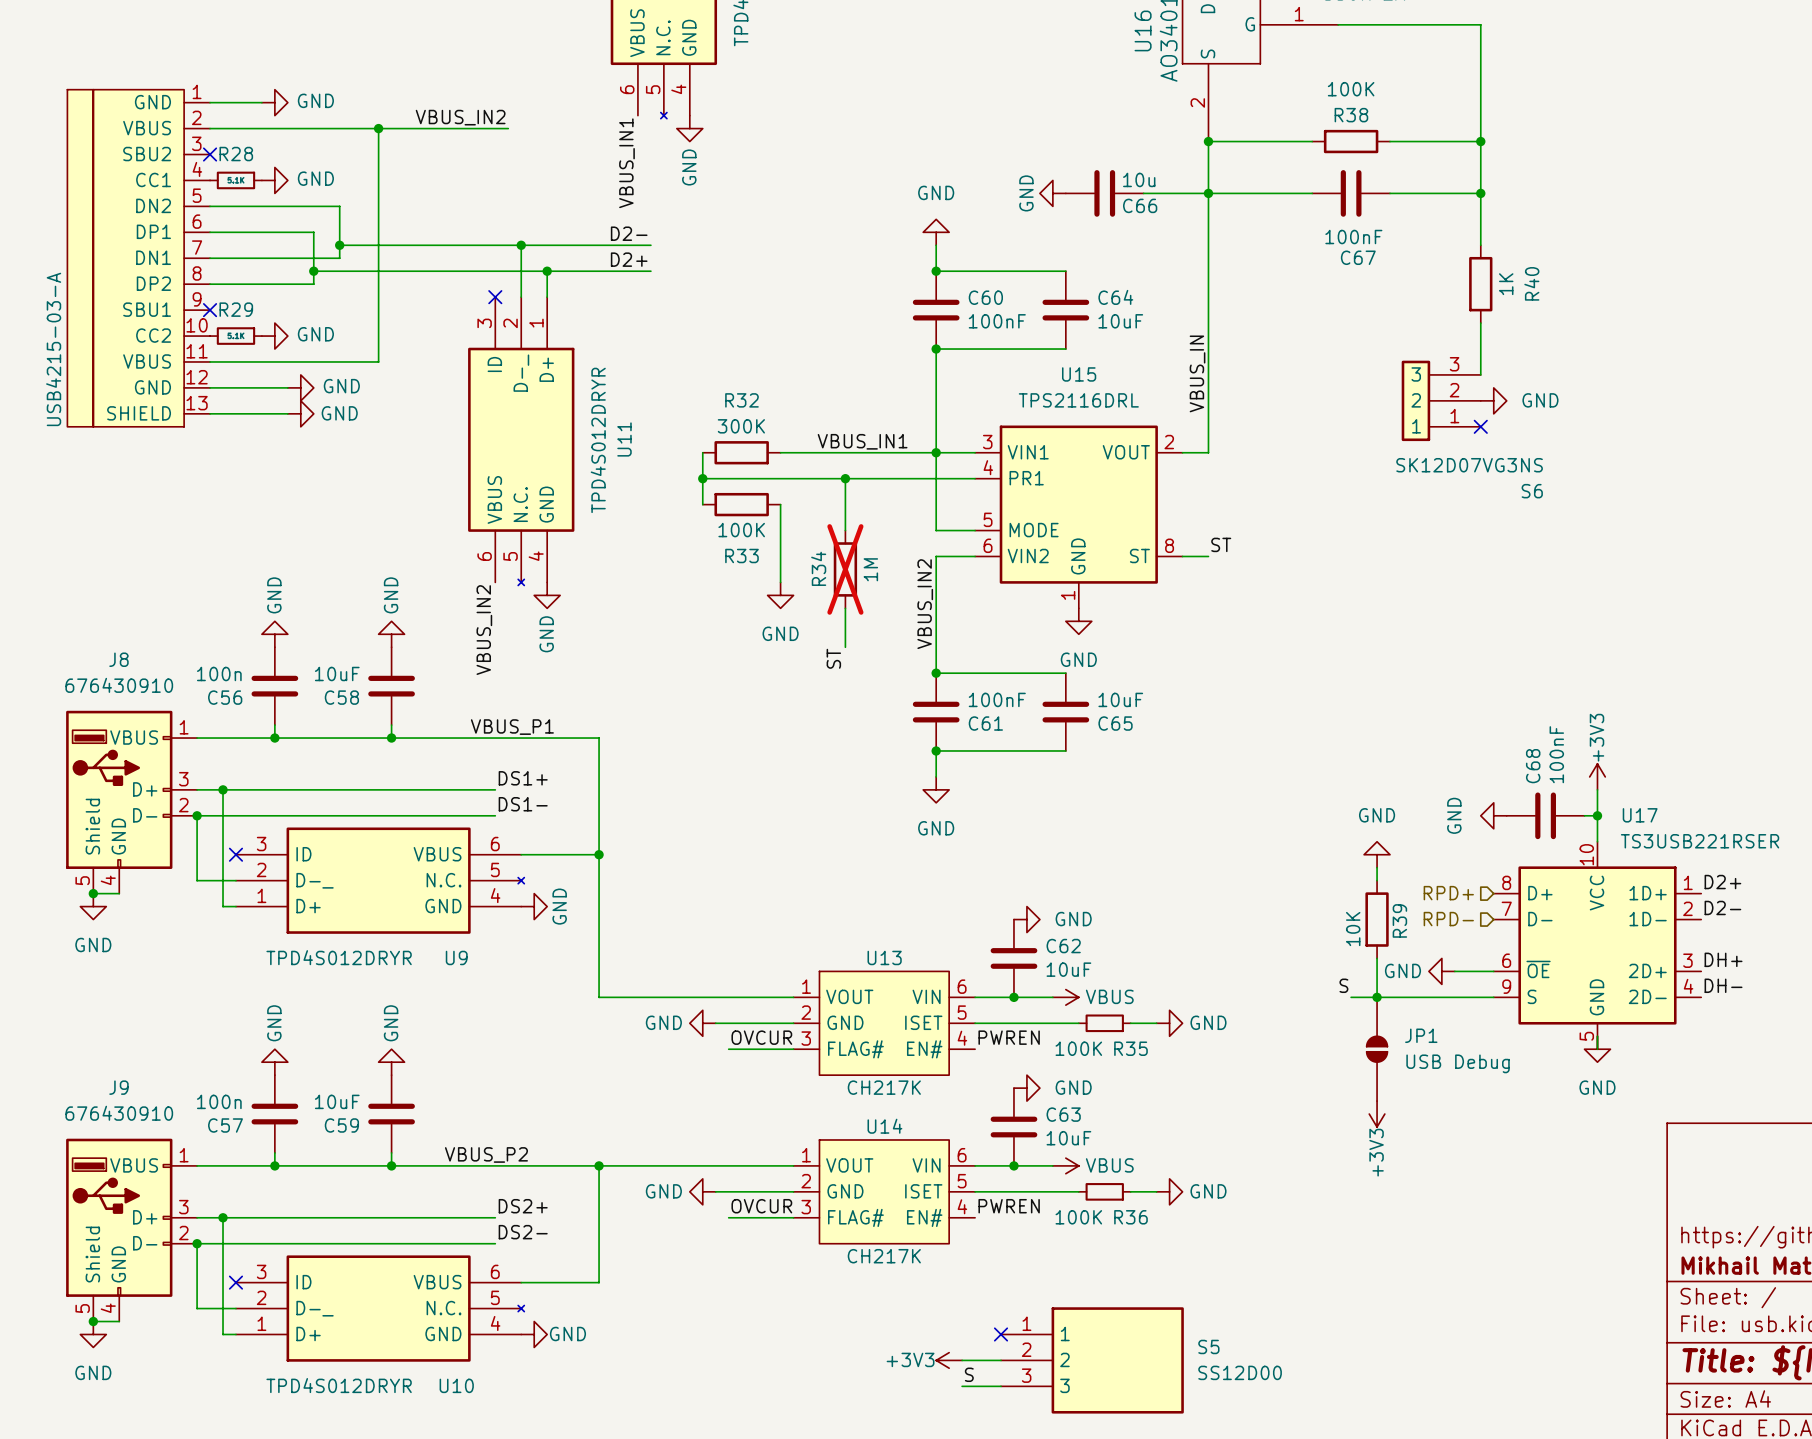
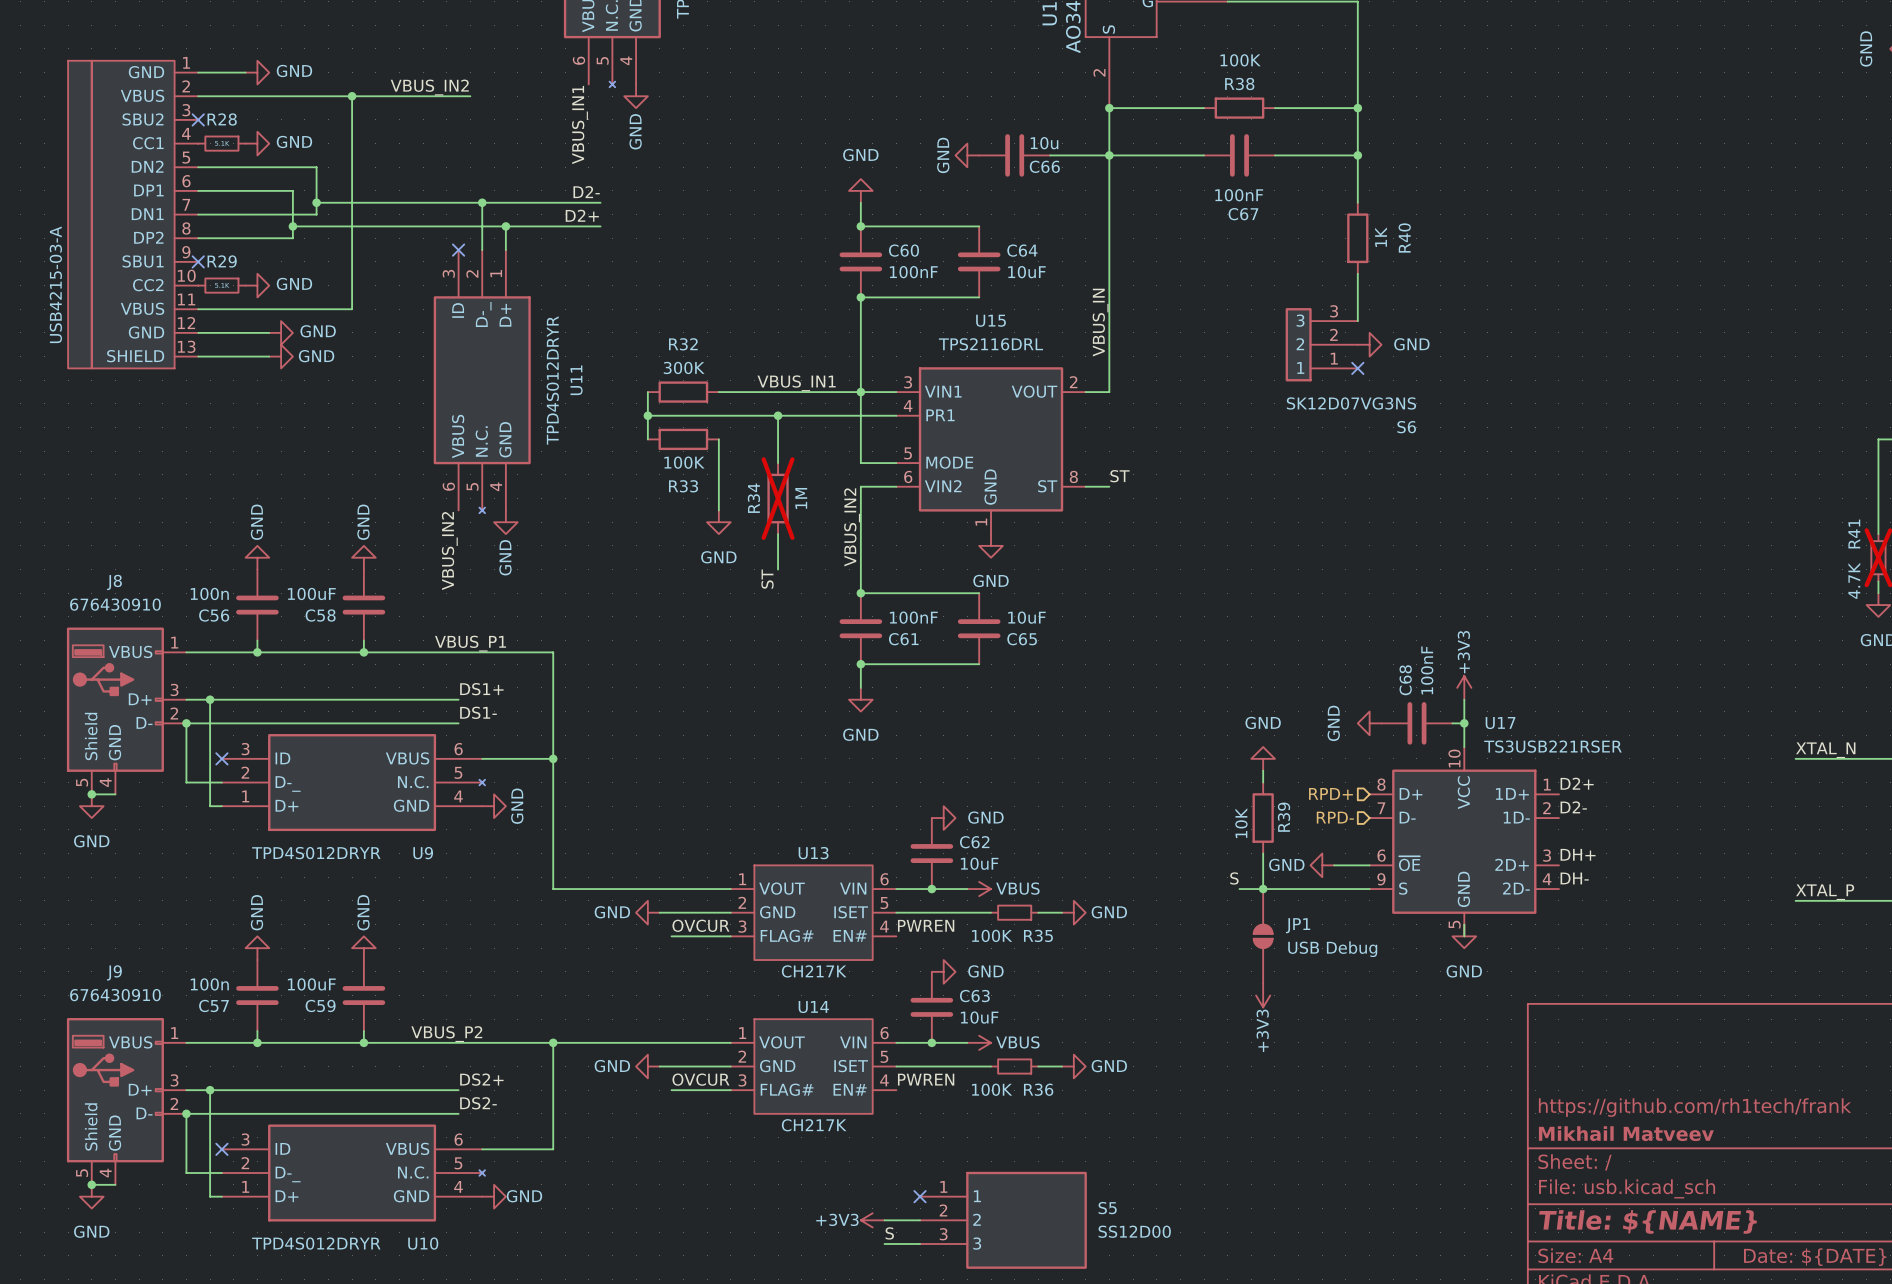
C58 value: 10uF (337, 673) -> 100uF (311, 593)
C59 value: 10uF (337, 1101) -> 100uF (311, 984)

